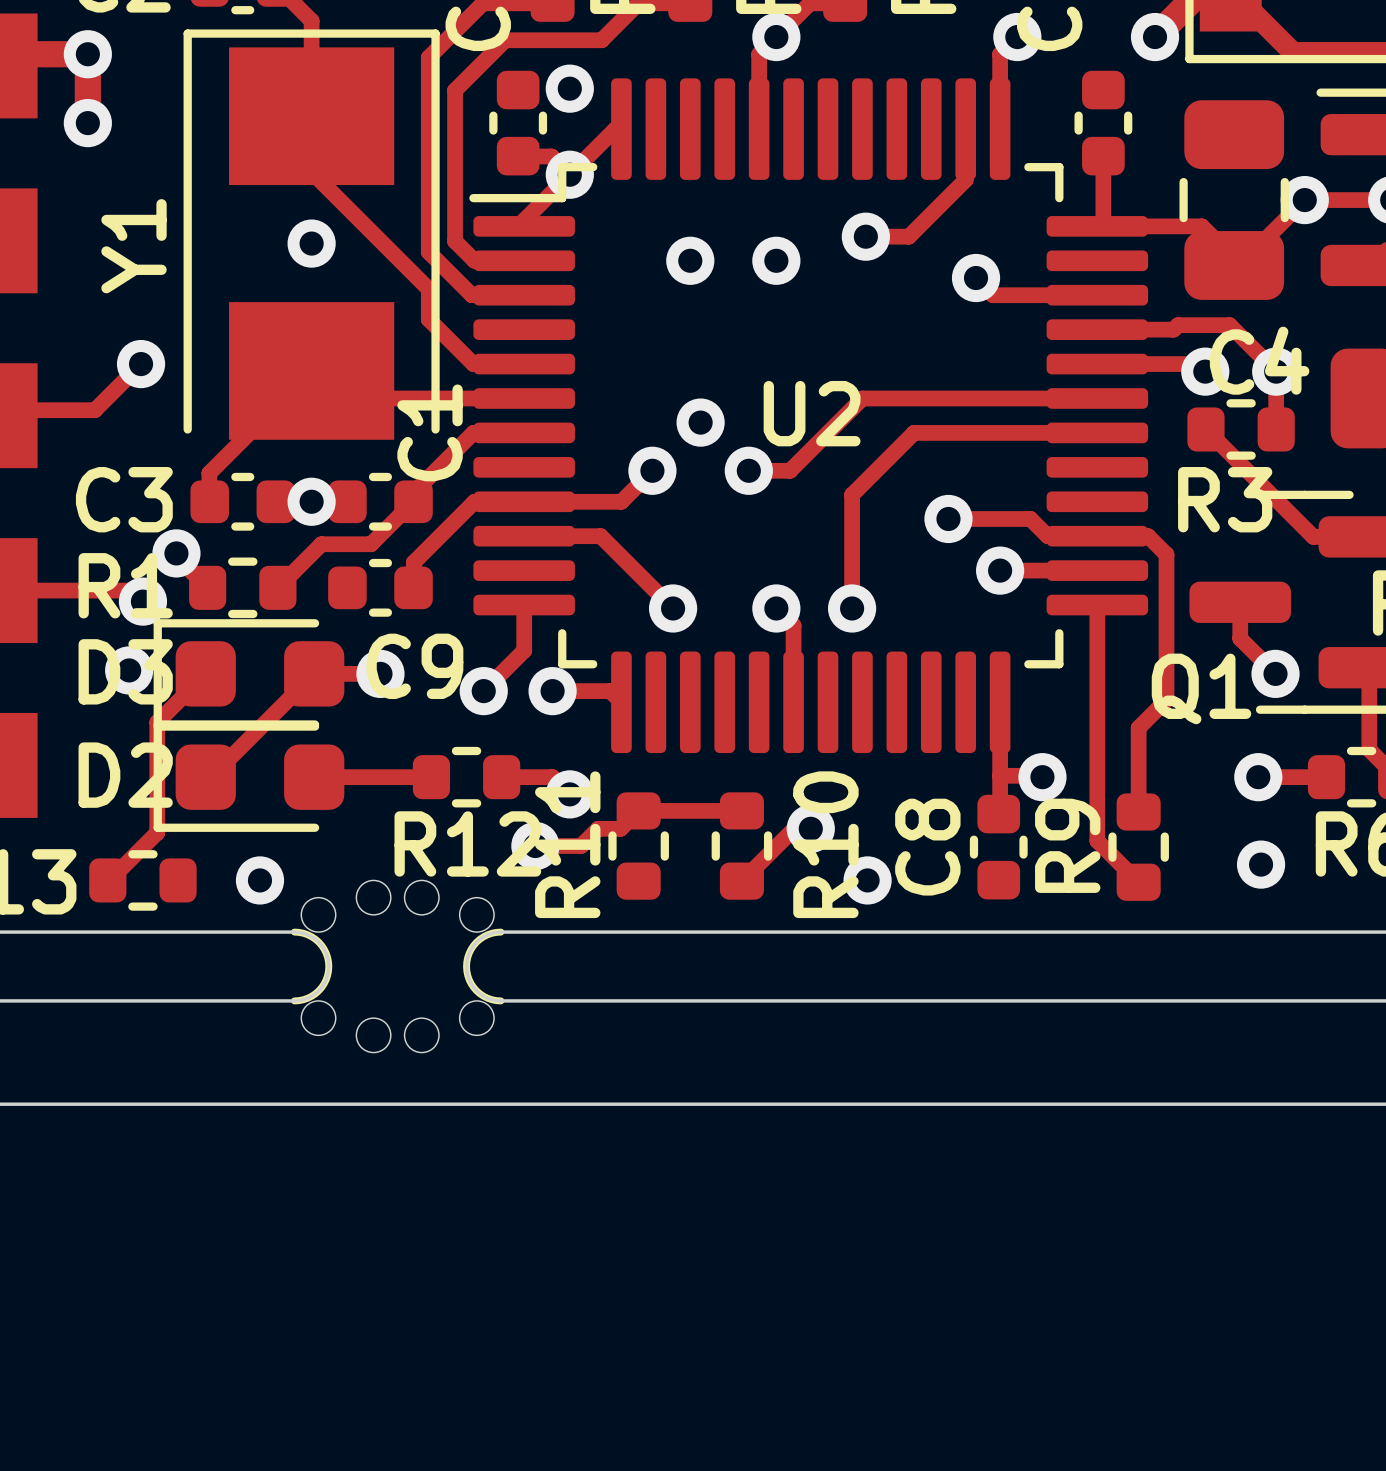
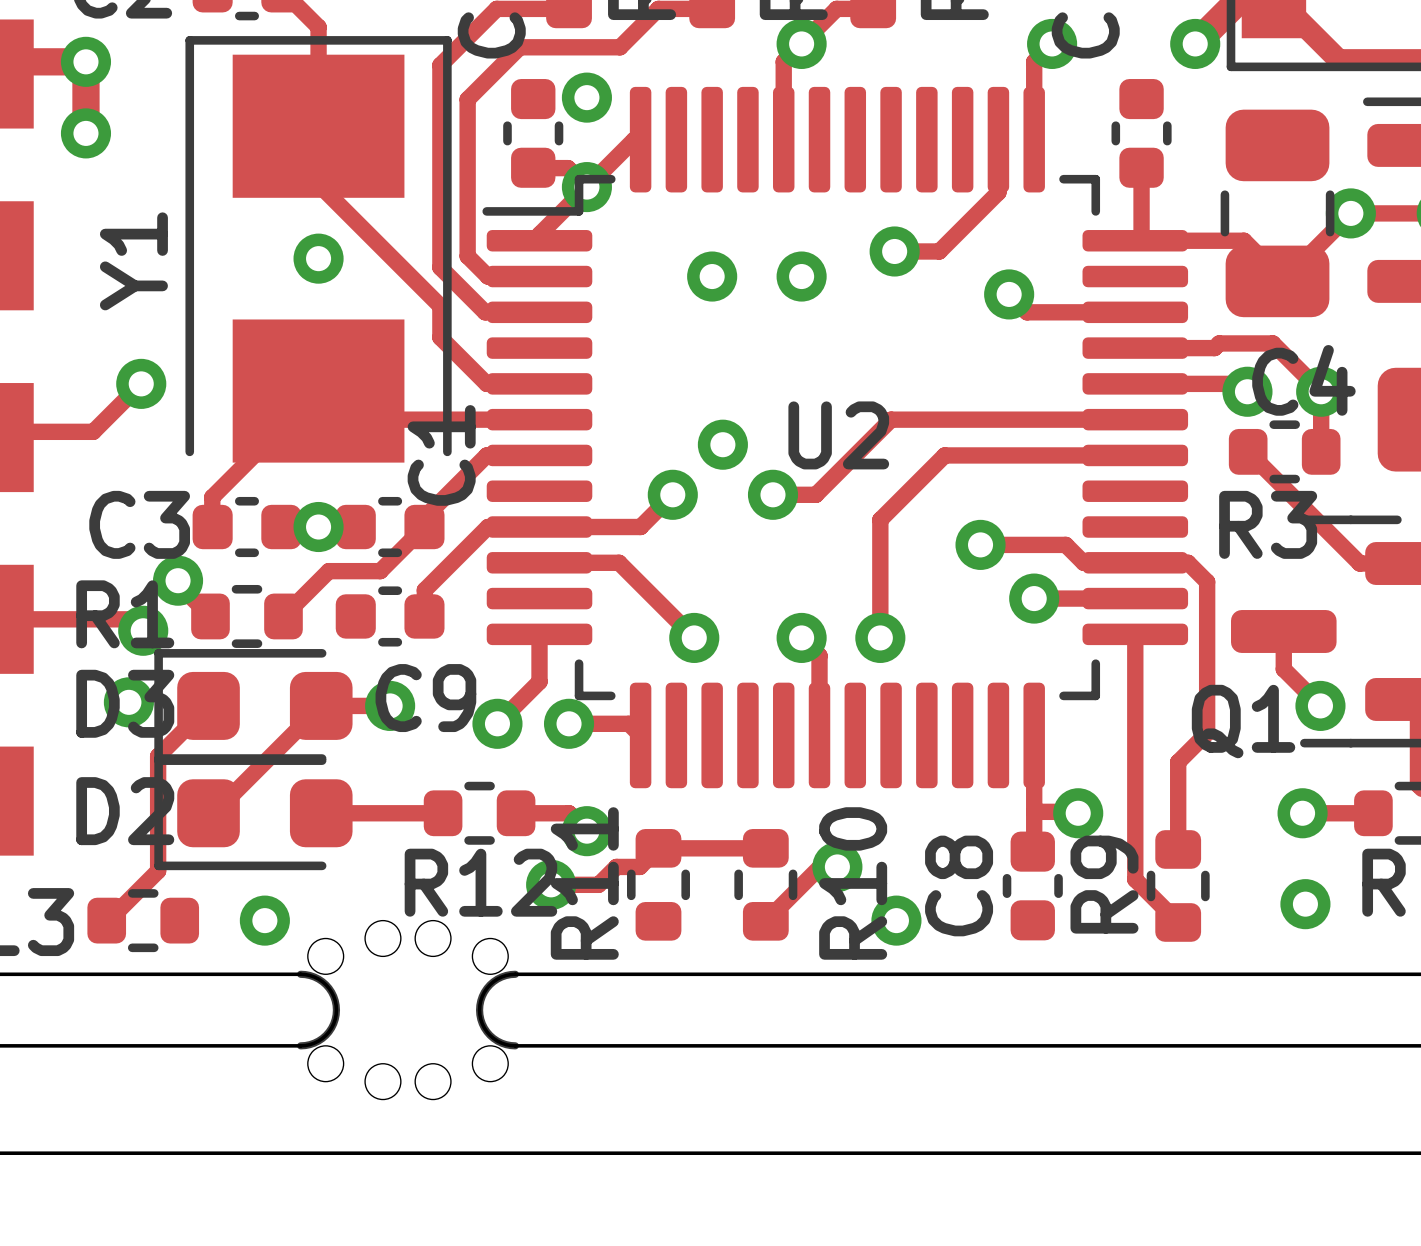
C3 name position: C3 (124, 499) -> C3 (139, 524)

